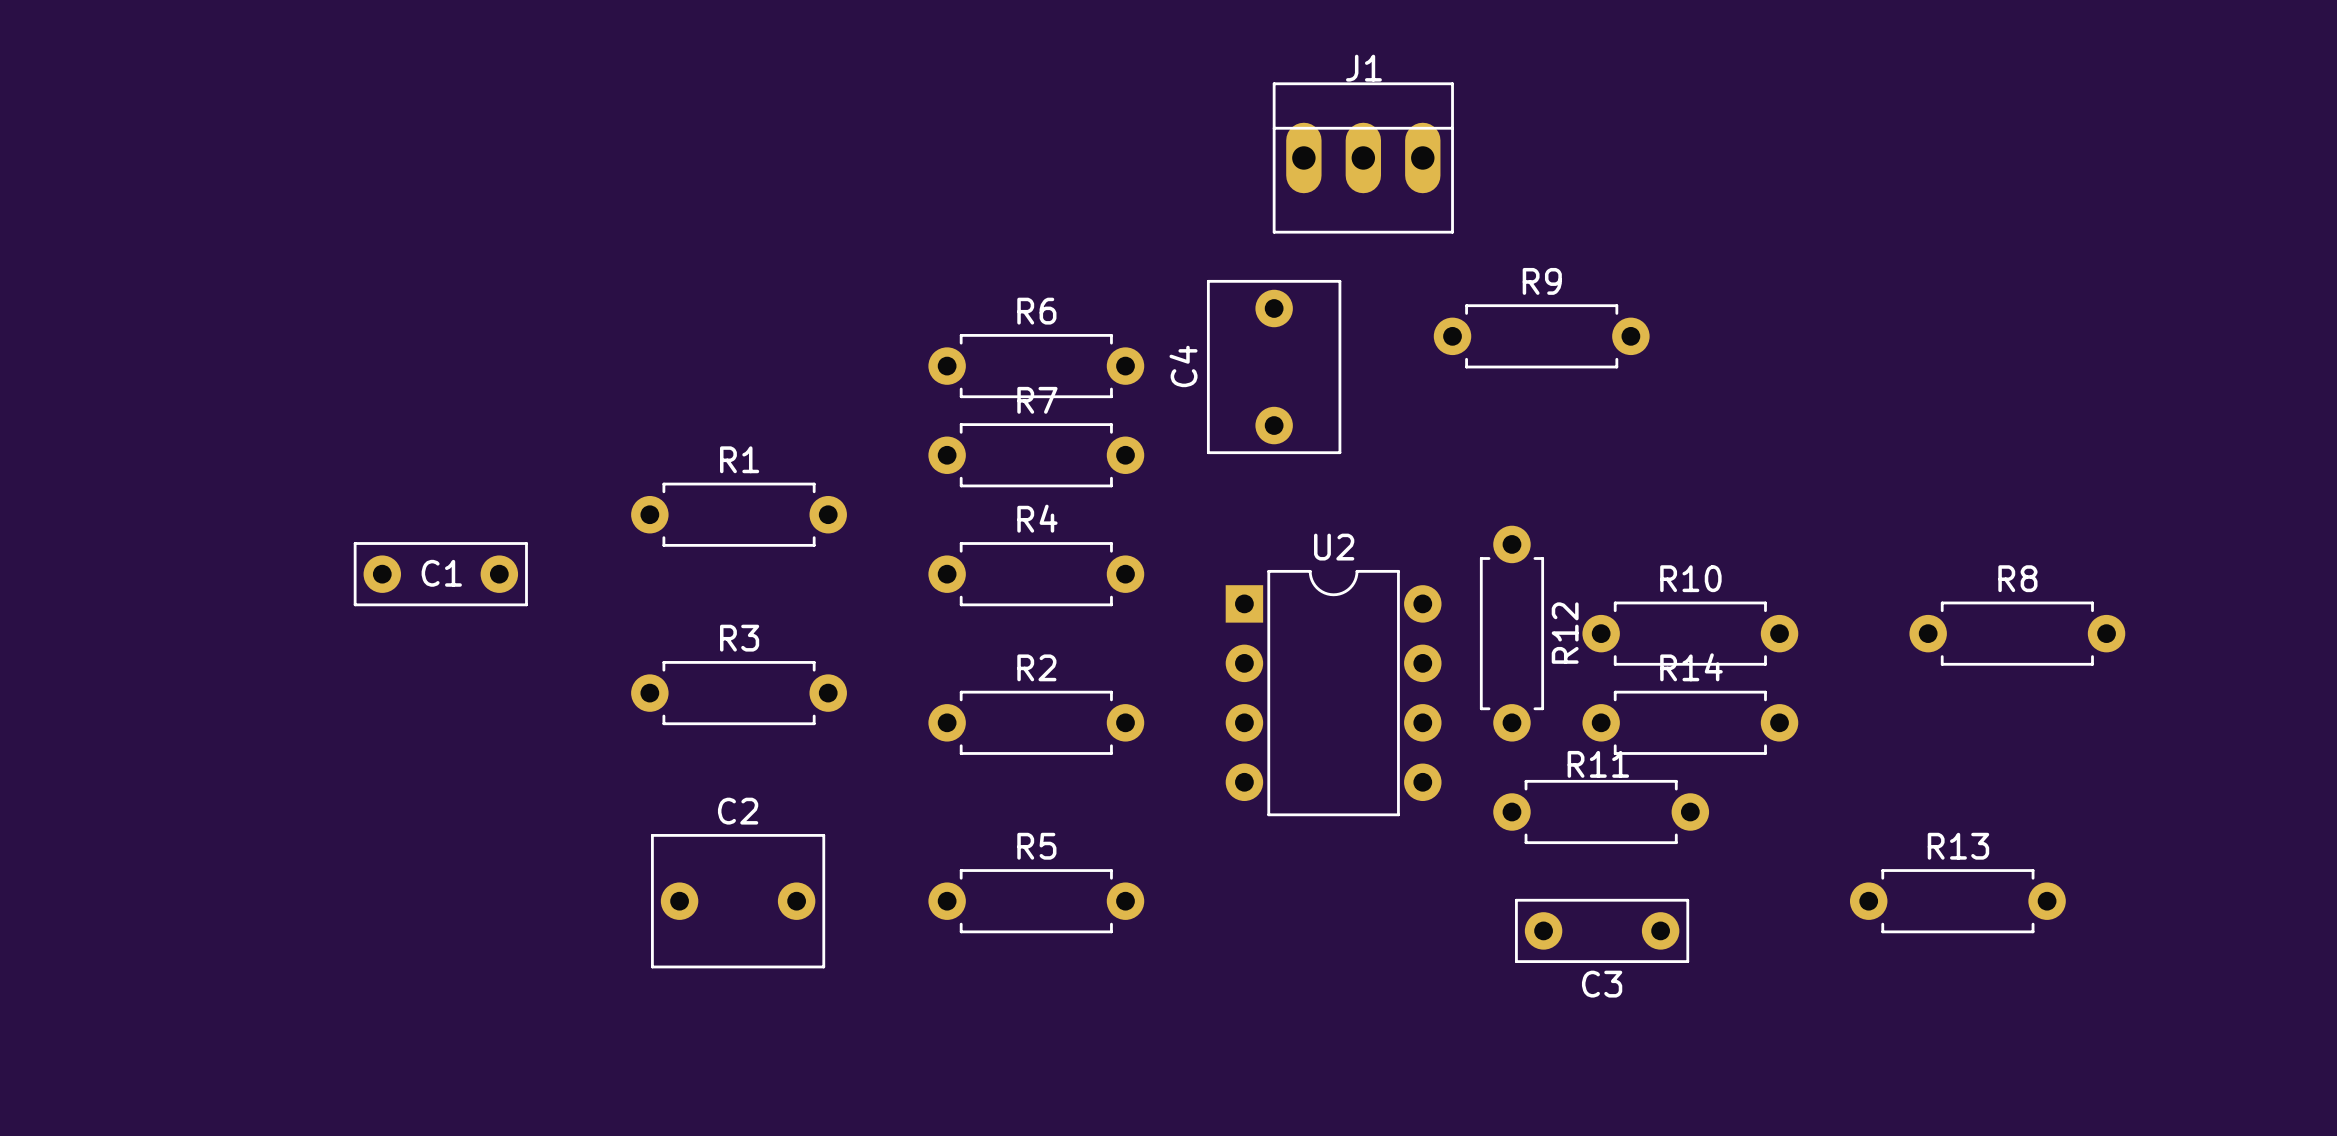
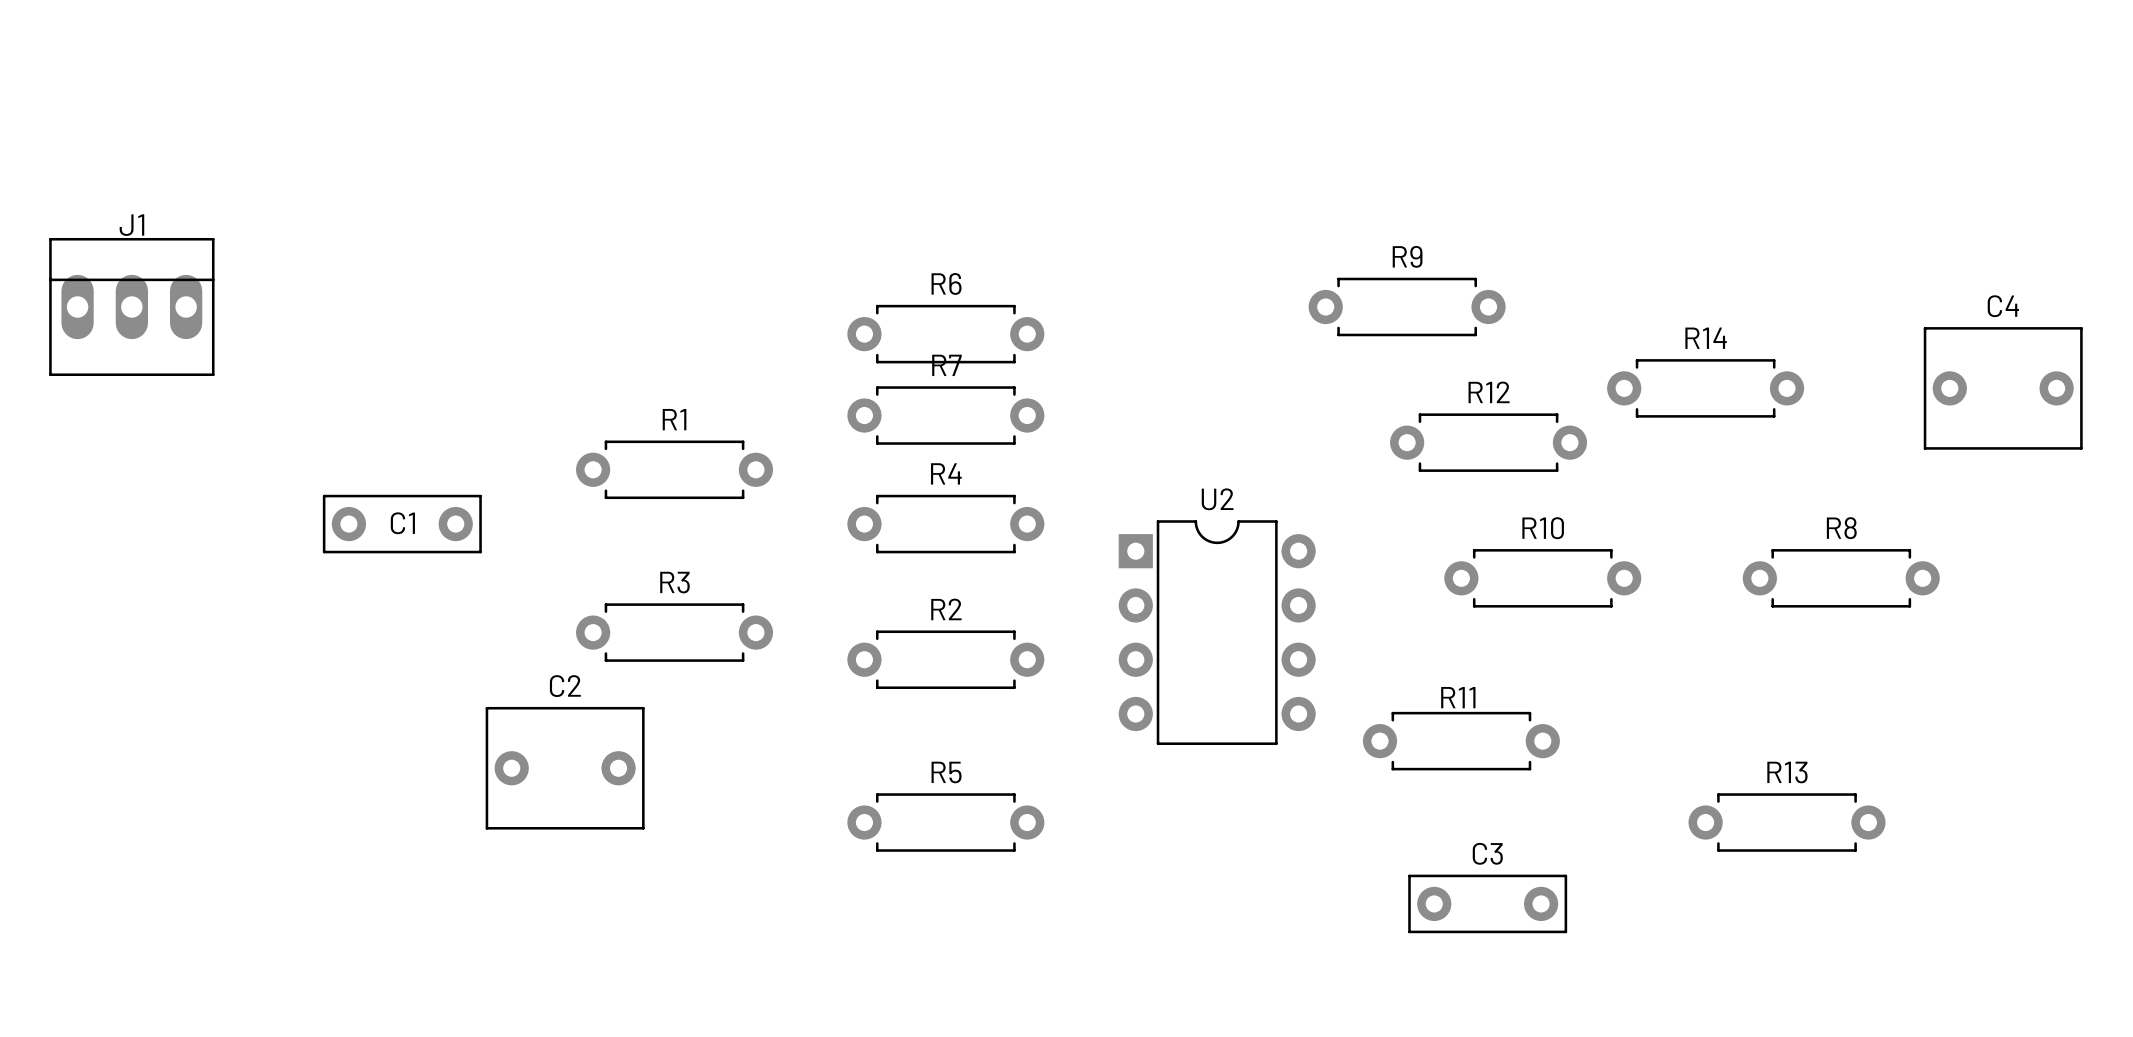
J1 position: (1363, 157) -> (131, 306)
C4 rotation: 0° (1274, 367) -> 90° clockwise (2003, 388)
C4 position: (1274, 367) -> (2003, 388)
R12 rotation: 0° (1511, 633) -> 90° clockwise (1488, 442)
R12 position: (1511, 633) -> (1488, 442)
R12 name position: R12 (1565, 633) -> R12 (1489, 392)
R14 position: (1690, 722) -> (1705, 388)
C2 position: (738, 901) -> (565, 768)
C3 position: (1602, 930) -> (1487, 903)
C3 name position: C3 (1602, 984) -> C3 (1487, 853)

